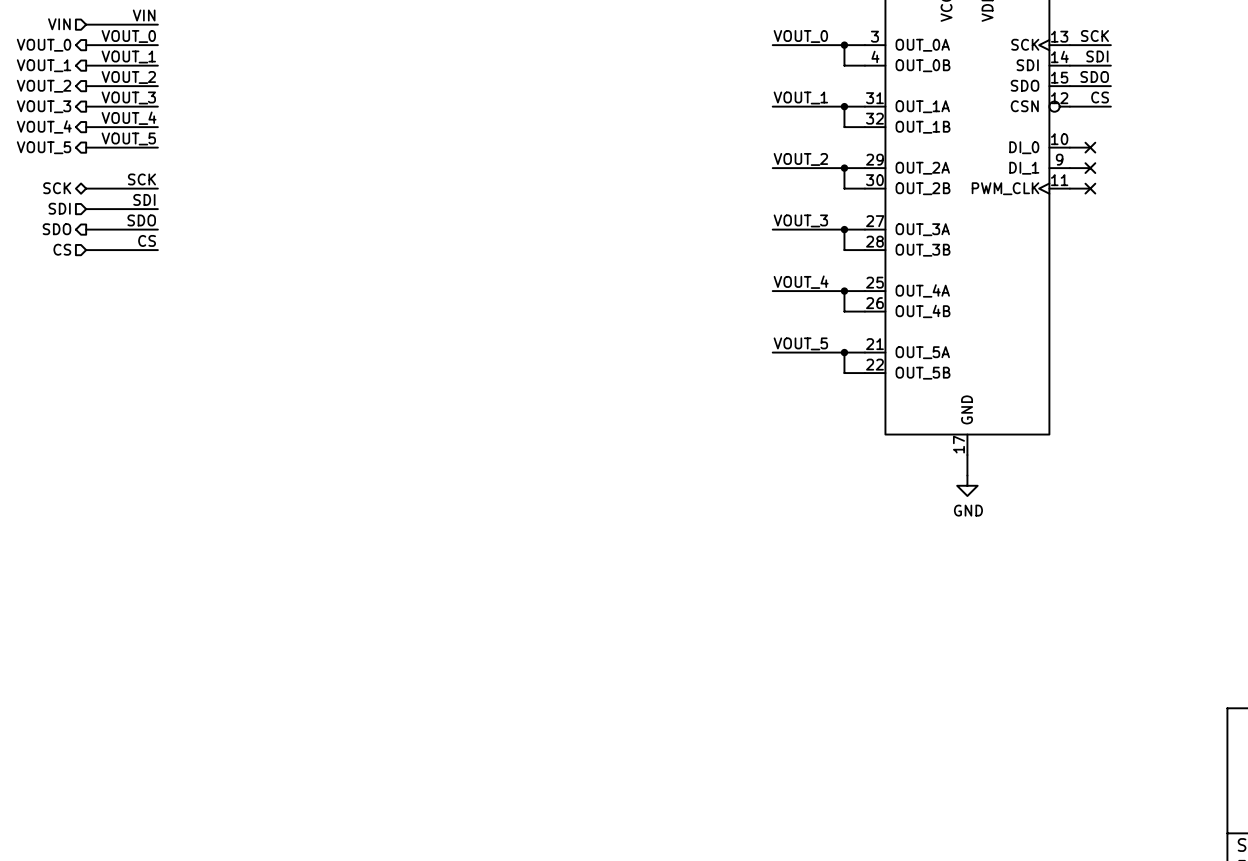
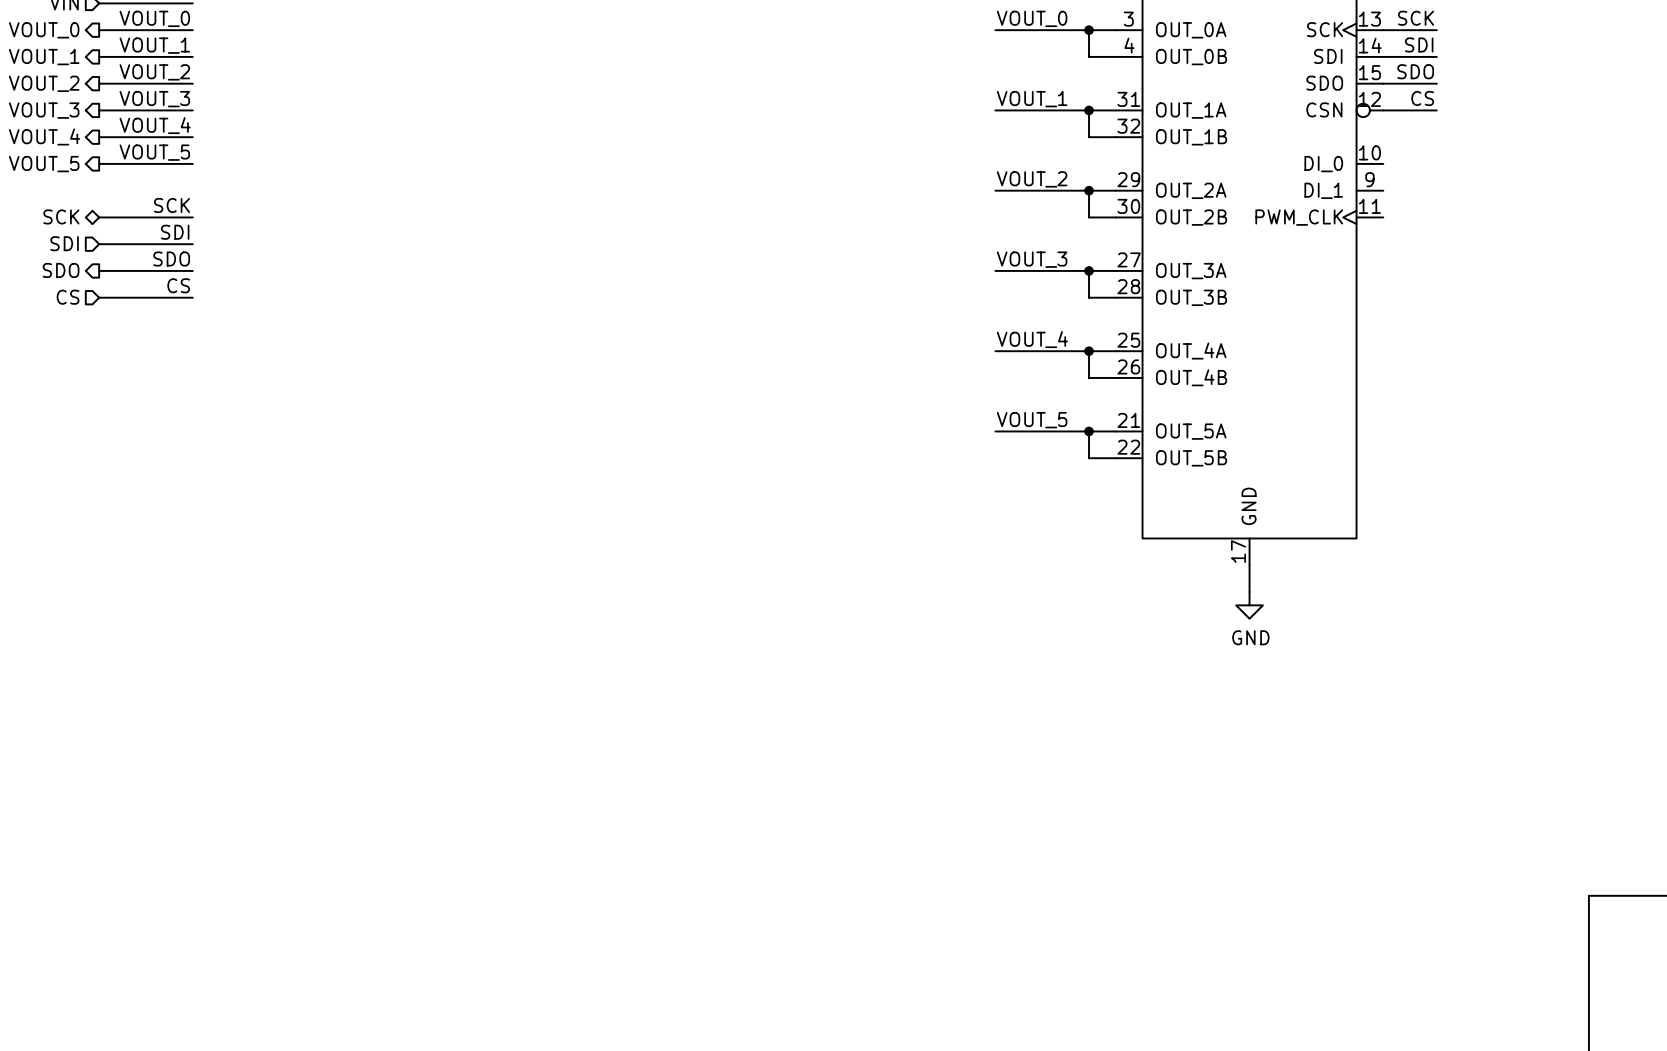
wire: (1069, 147) (1090, 147) -> none
no-connect mark: (1090, 147) -> none
wire: (1069, 168) (1090, 168) -> none
no-connect mark: (1090, 168) -> none
wire: (1069, 188) (1090, 188) -> none
no-connect mark: (1090, 188) -> none

